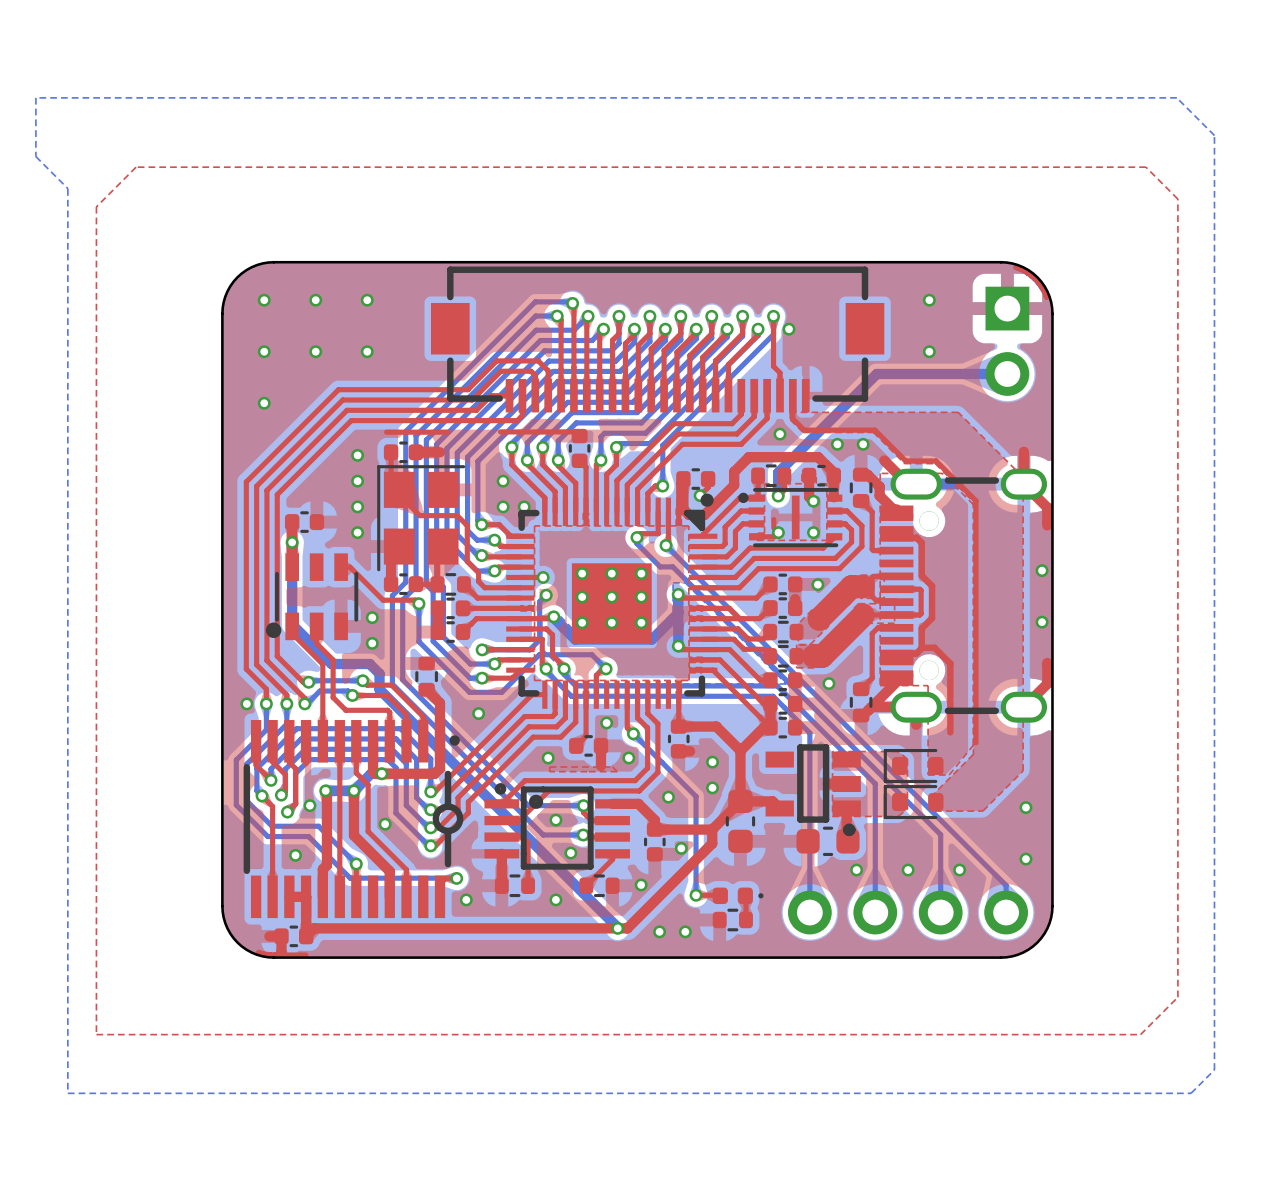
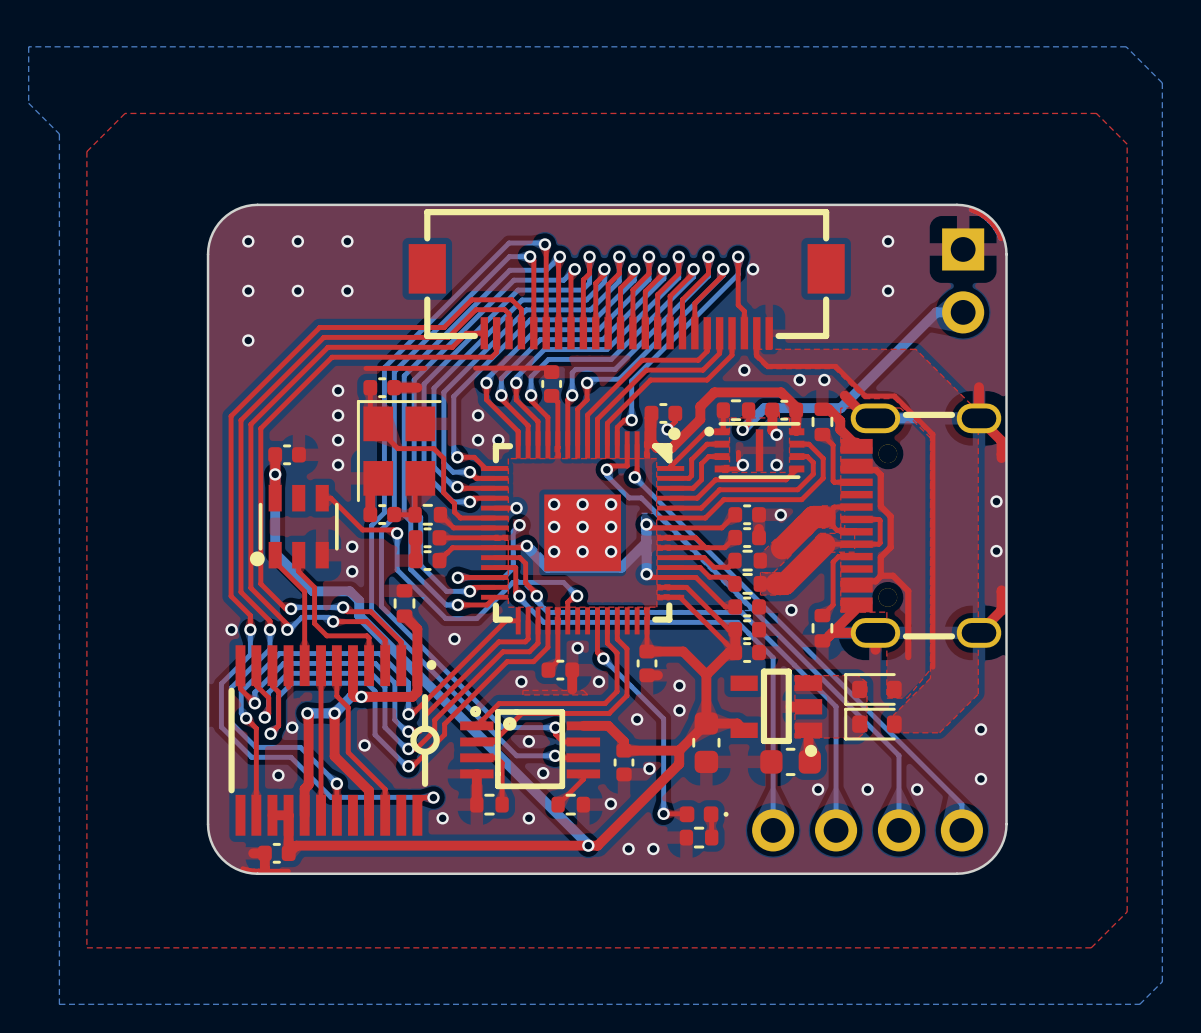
bottom track: (979, 373) (876, 373) (778, 472) (778, 496) -> (936, 312) (840, 408) (764, 408) (742, 429)

